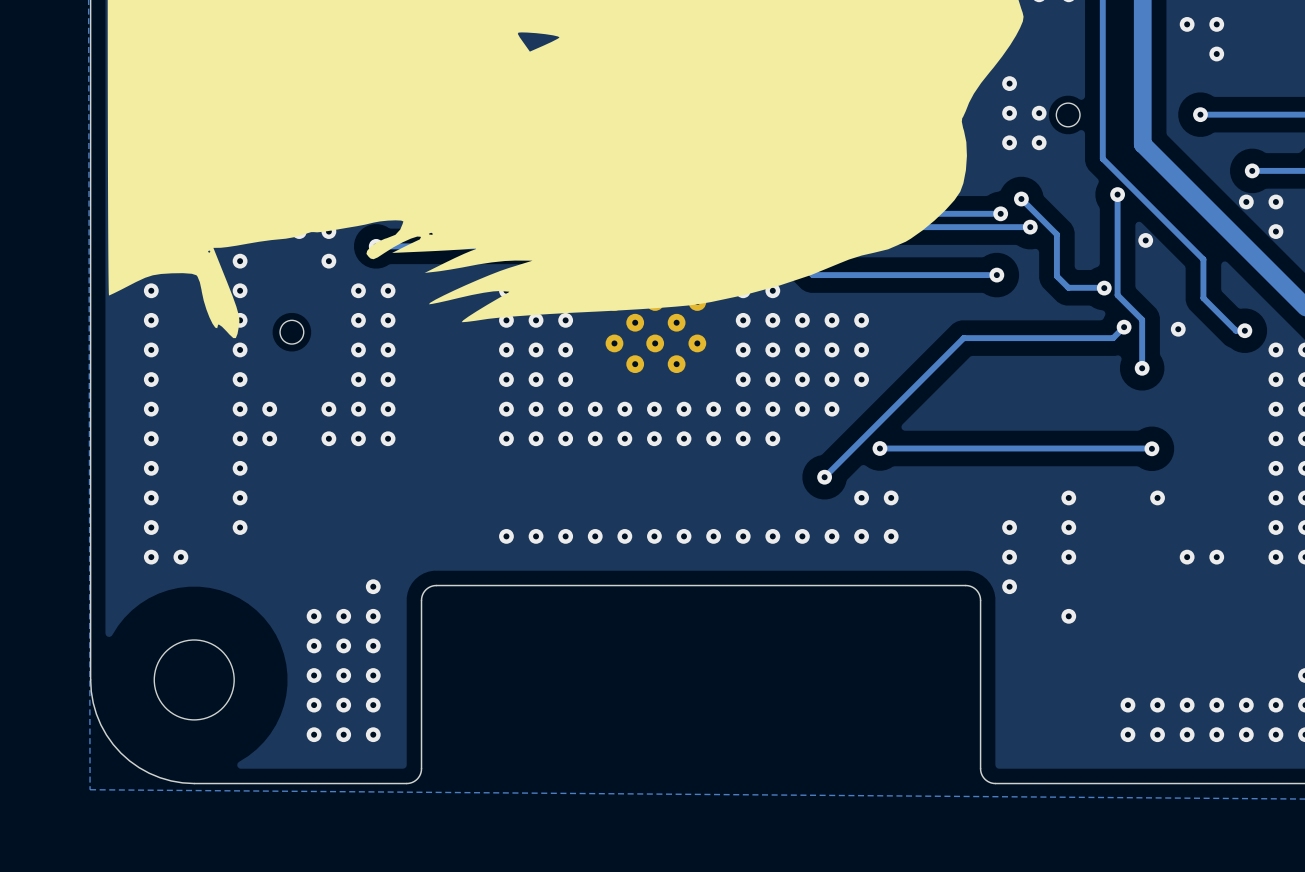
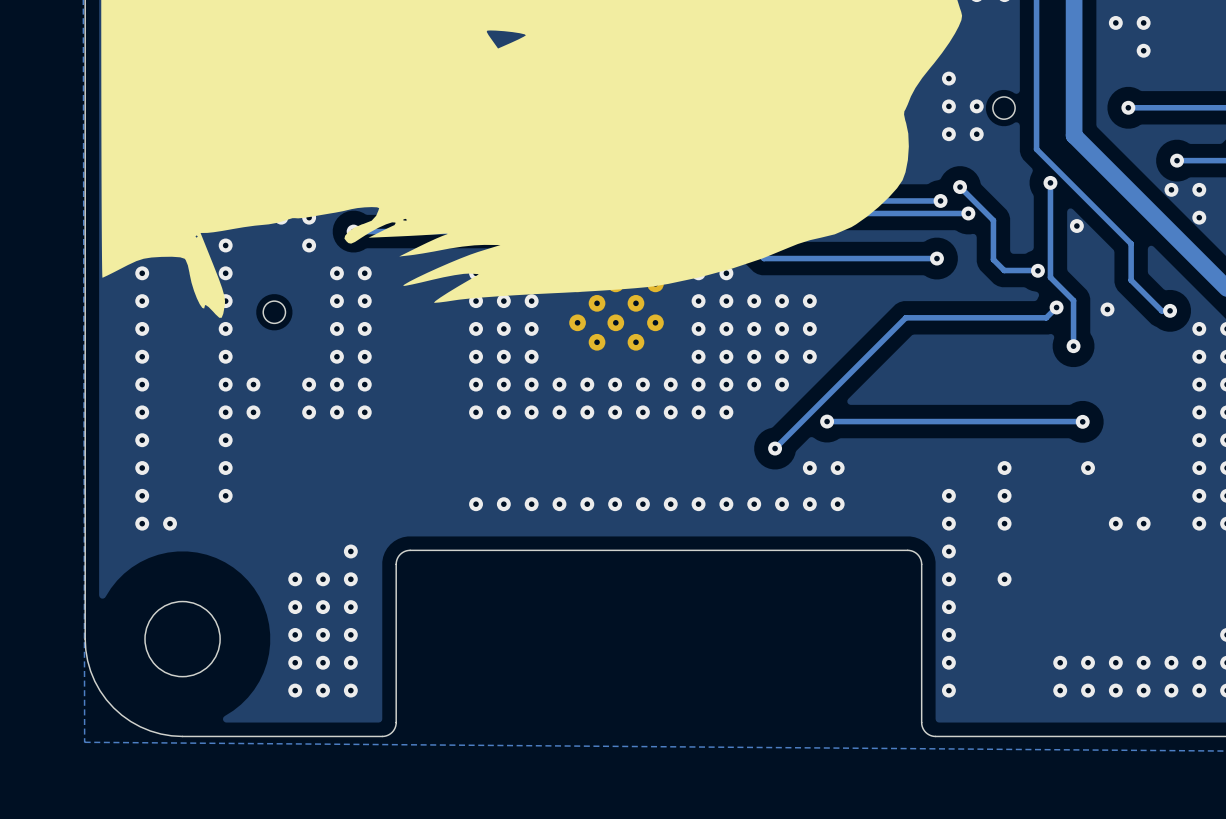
via: none -> (948, 579)
via: none -> (948, 607)
via: none -> (948, 634)
via: none -> (948, 662)
via: none -> (948, 690)

